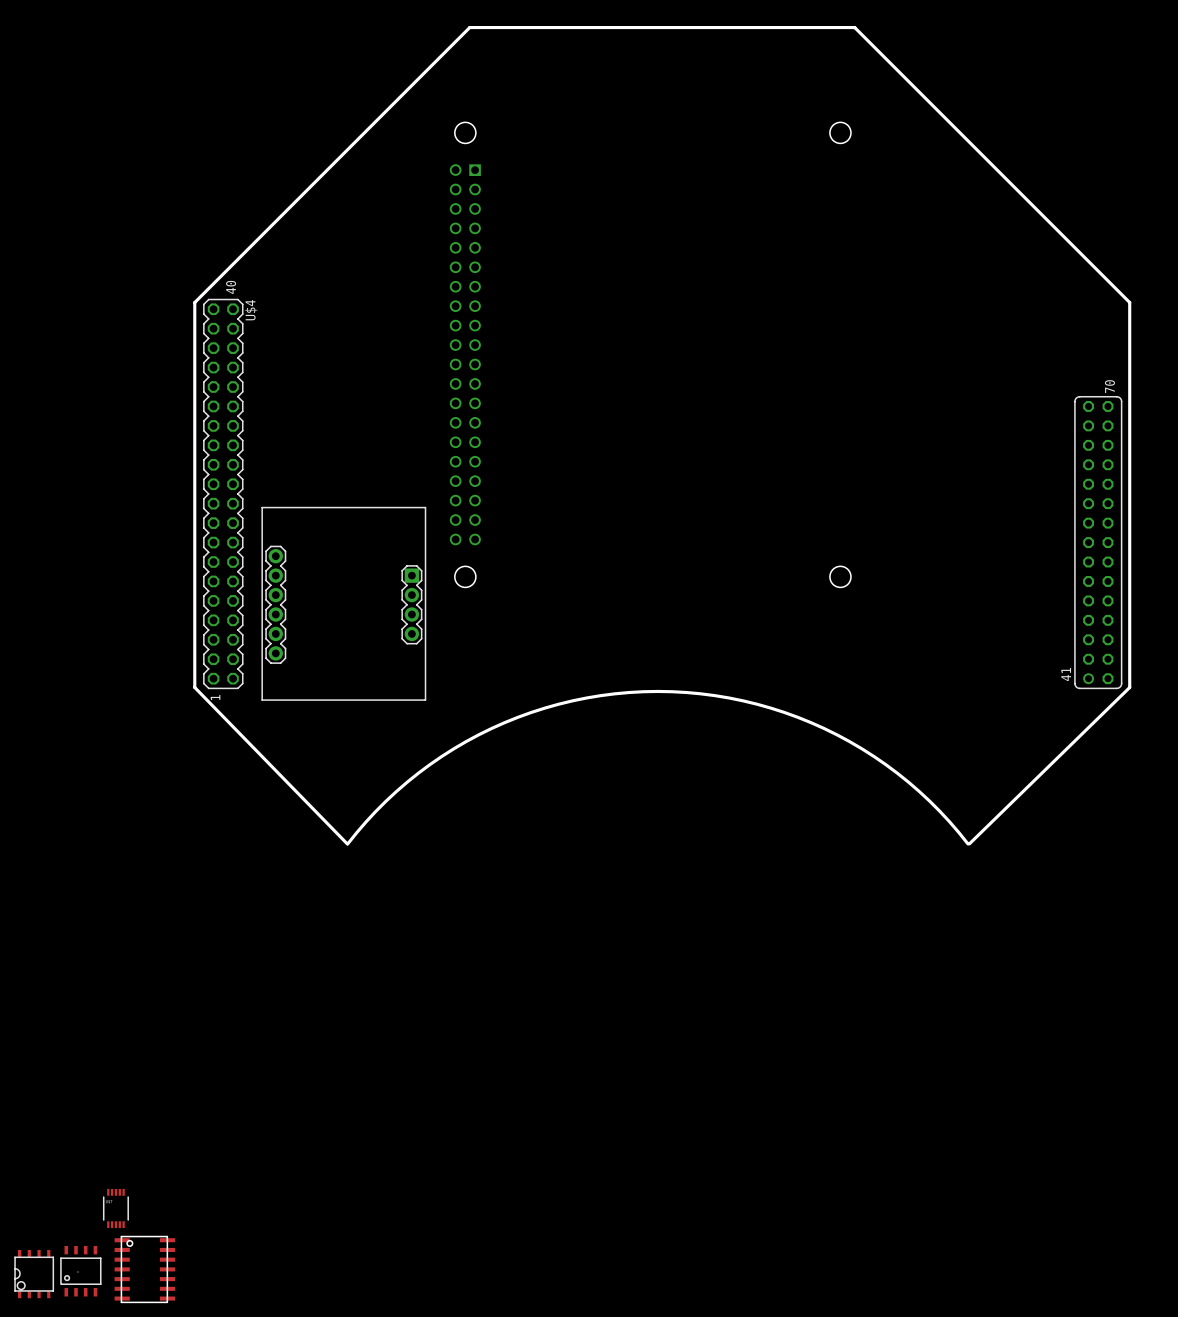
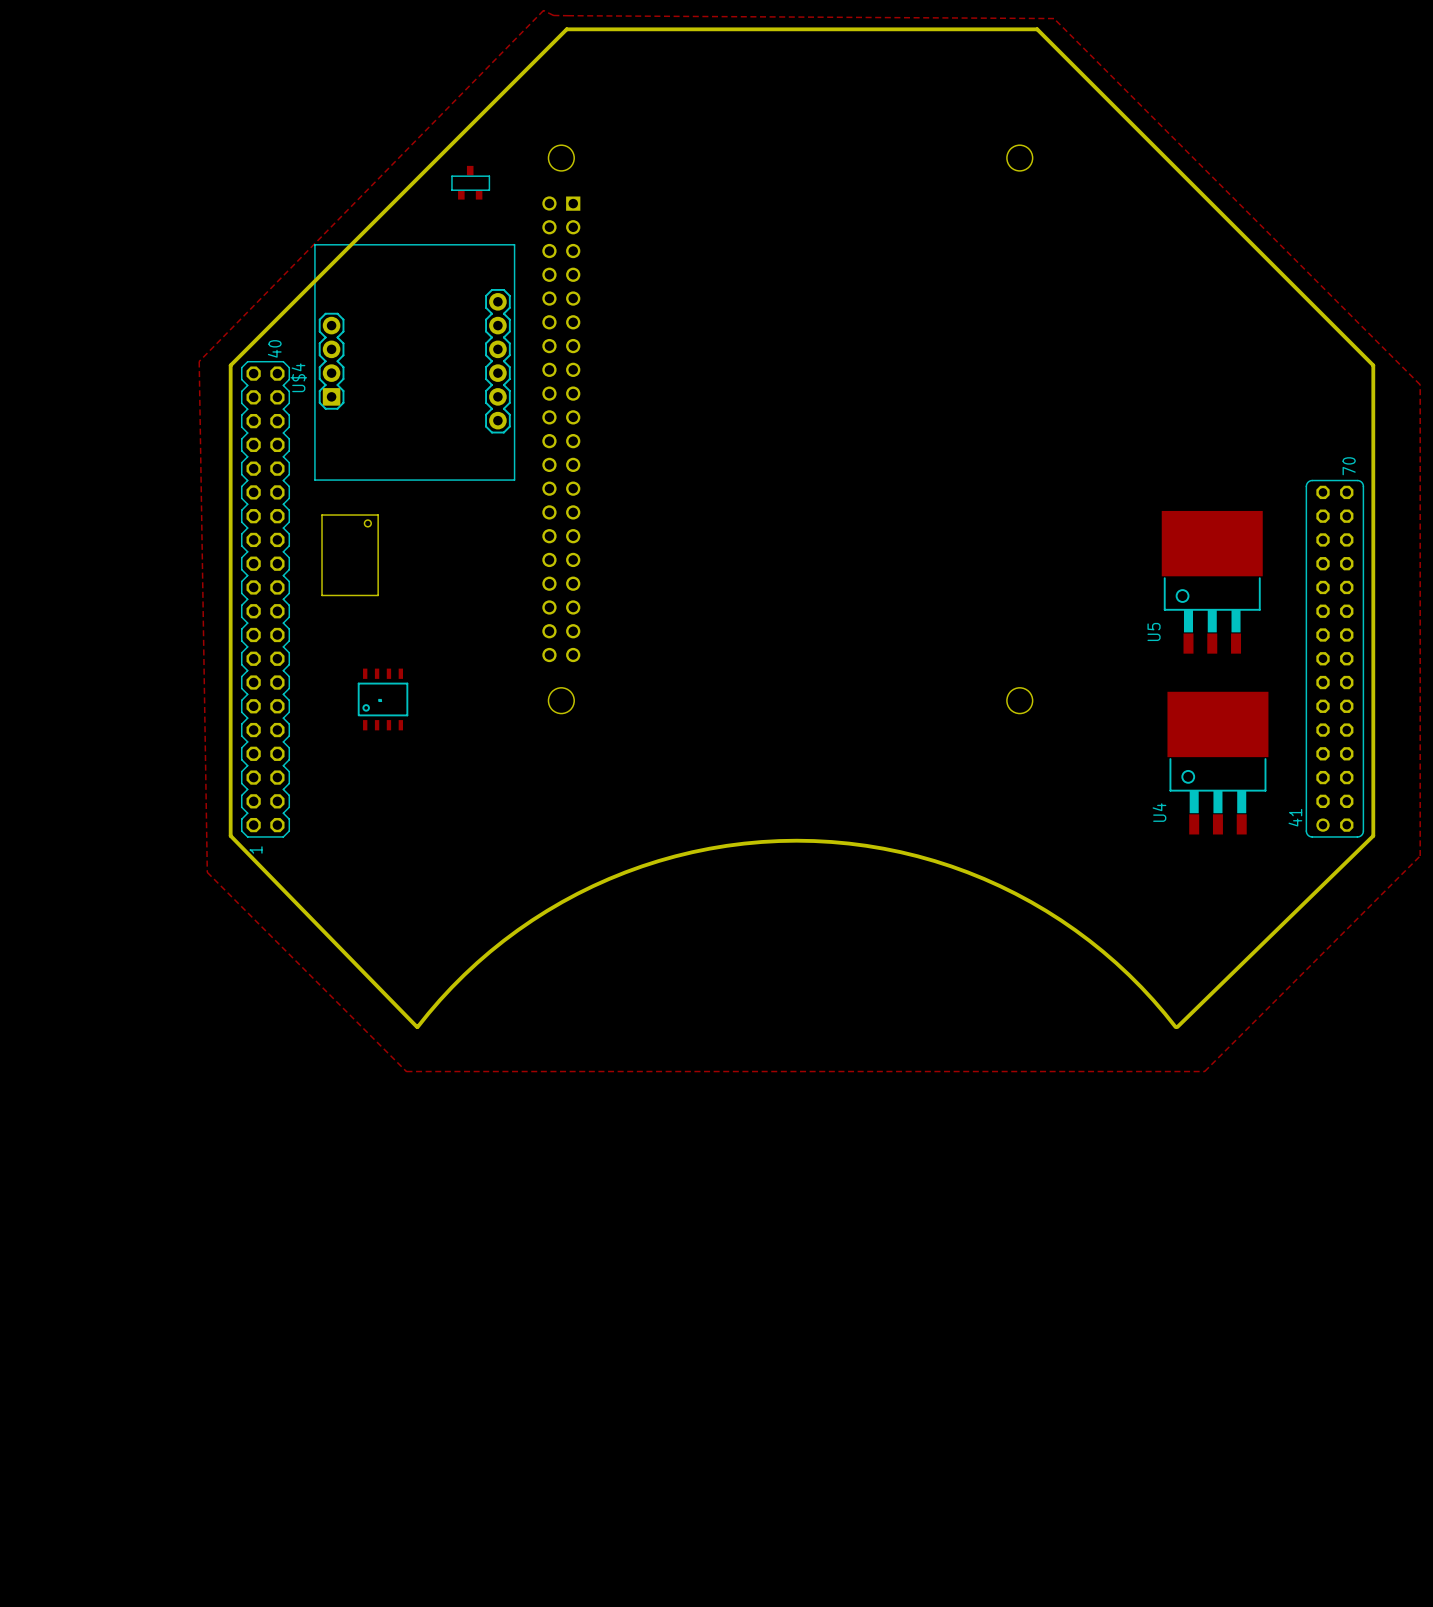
zone outline: none -> (543, 10) (553, 15) (1053, 18) (1420, 384) (1420, 855) (1204, 1071) (406, 1071) (207, 872) (199, 361) (543, 10)
part: none -> (470, 182)
part: none -> (414, 362)
part: none -> (350, 555)
U5: none -> (1212, 582)
part: (343, 603) -> none
U4: none -> (1217, 763)
part: (115, 1208) -> none
part: (144, 1269) -> none
part position: (80, 1271) -> (383, 699)
part: (34, 1274) -> none

